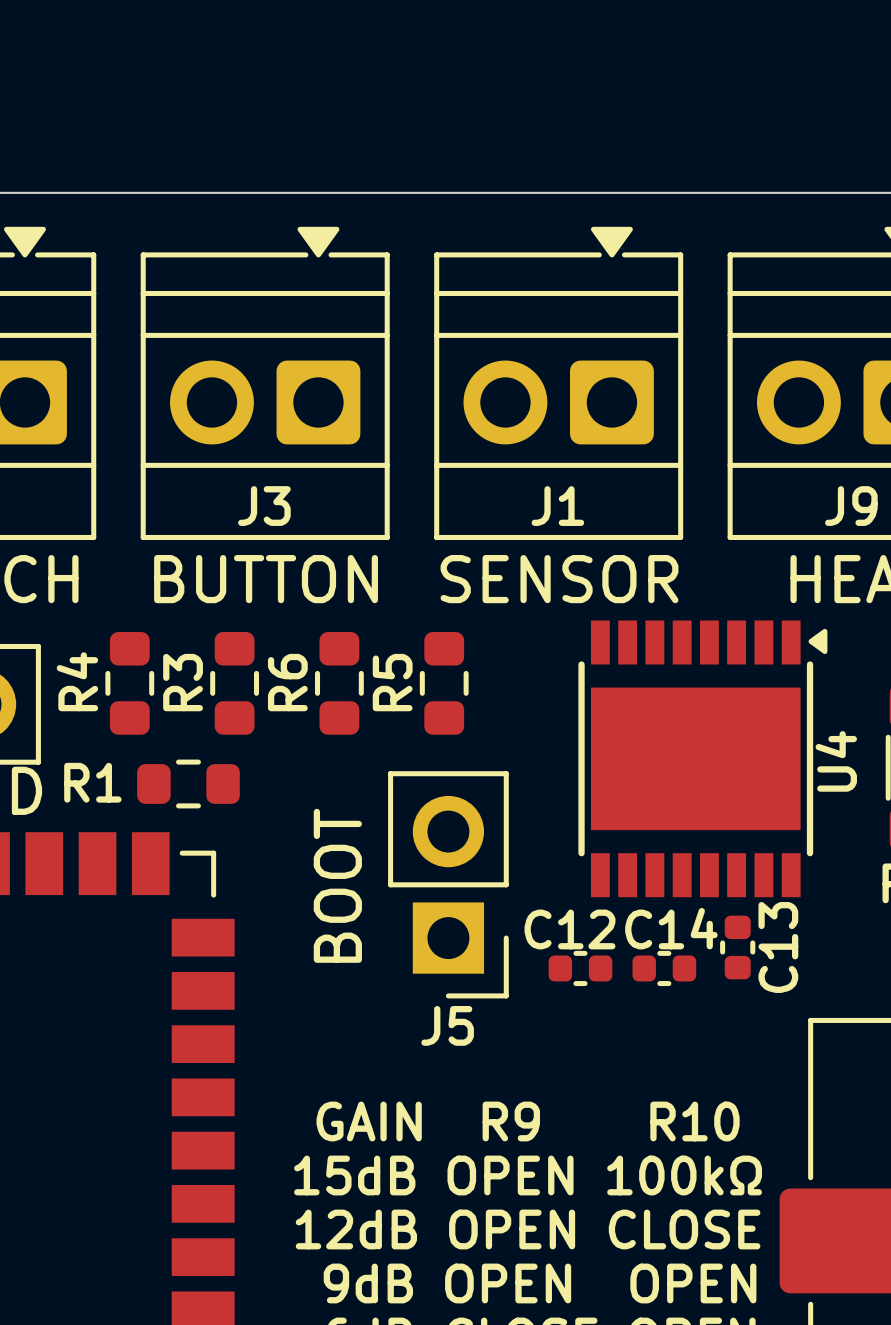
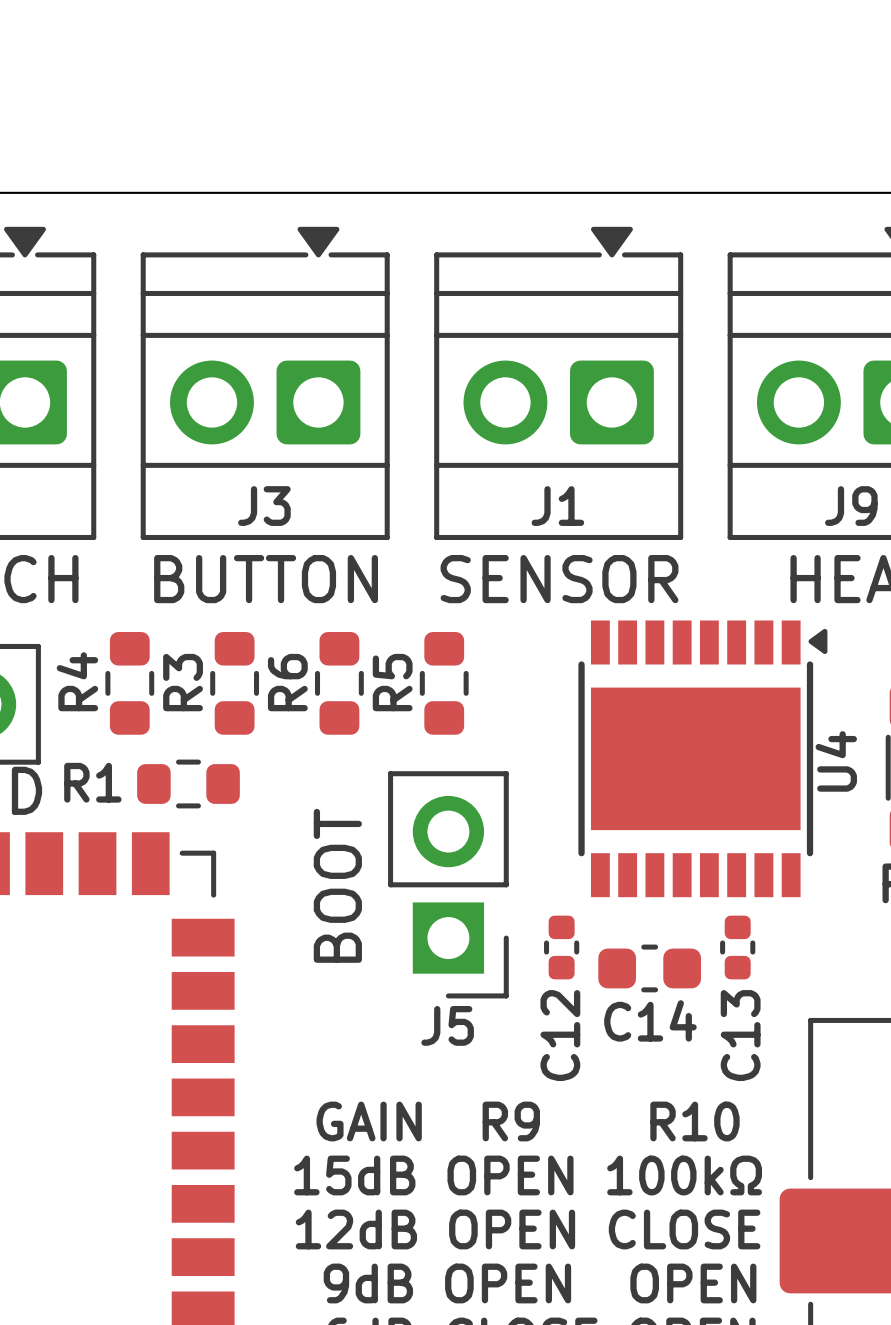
C14 name position: C14 (671, 928) -> C14 (650, 1020)
C12 name position: C12 (570, 929) -> C12 (560, 1035)
C13 name position: C13 (778, 947) -> C13 (740, 1035)
C14 footprint: [632, 950, 697, 987] -> [598, 944, 702, 993]
C12 rotation: 0° (580, 968) -> 90° clockwise (561, 947)

